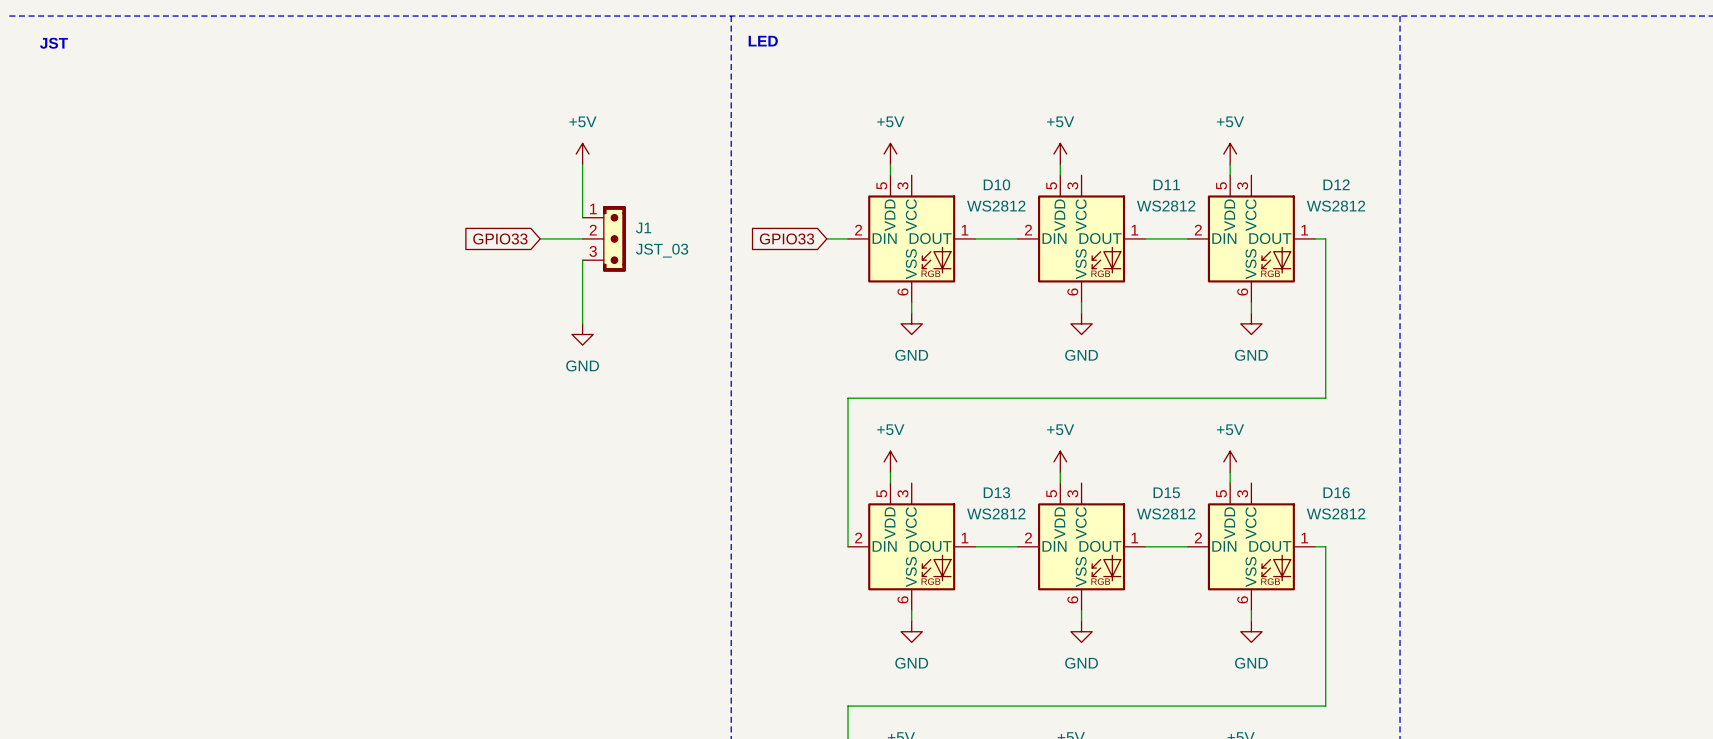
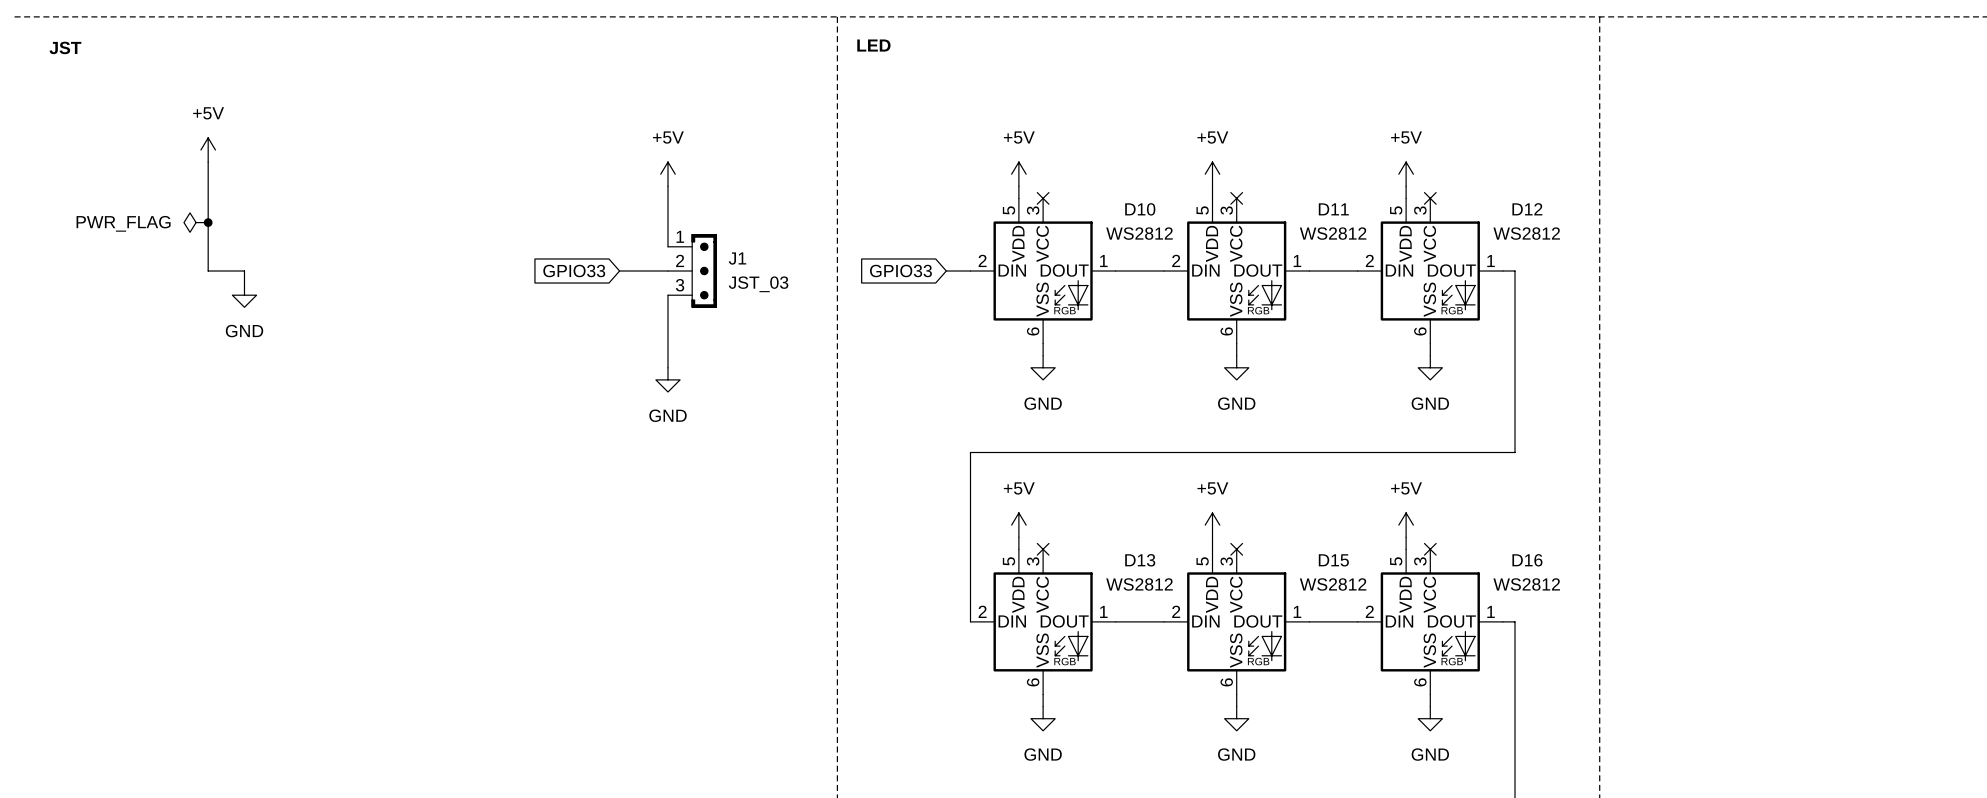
power symbol: none -> +5V (208, 150)
wire: none -> (208, 162) (208, 271) (244, 271) (244, 283)
no-connect mark: none -> (1043, 198)
no-connect mark: none -> (1236, 198)
no-connect mark: none -> (1430, 198)
power symbol: none -> PWR_FLAG (196, 222)
junction: none -> (208, 222)
power symbol: none -> GND (244, 295)
no-connect mark: none -> (1043, 549)
no-connect mark: none -> (1236, 549)
no-connect mark: none -> (1430, 549)

